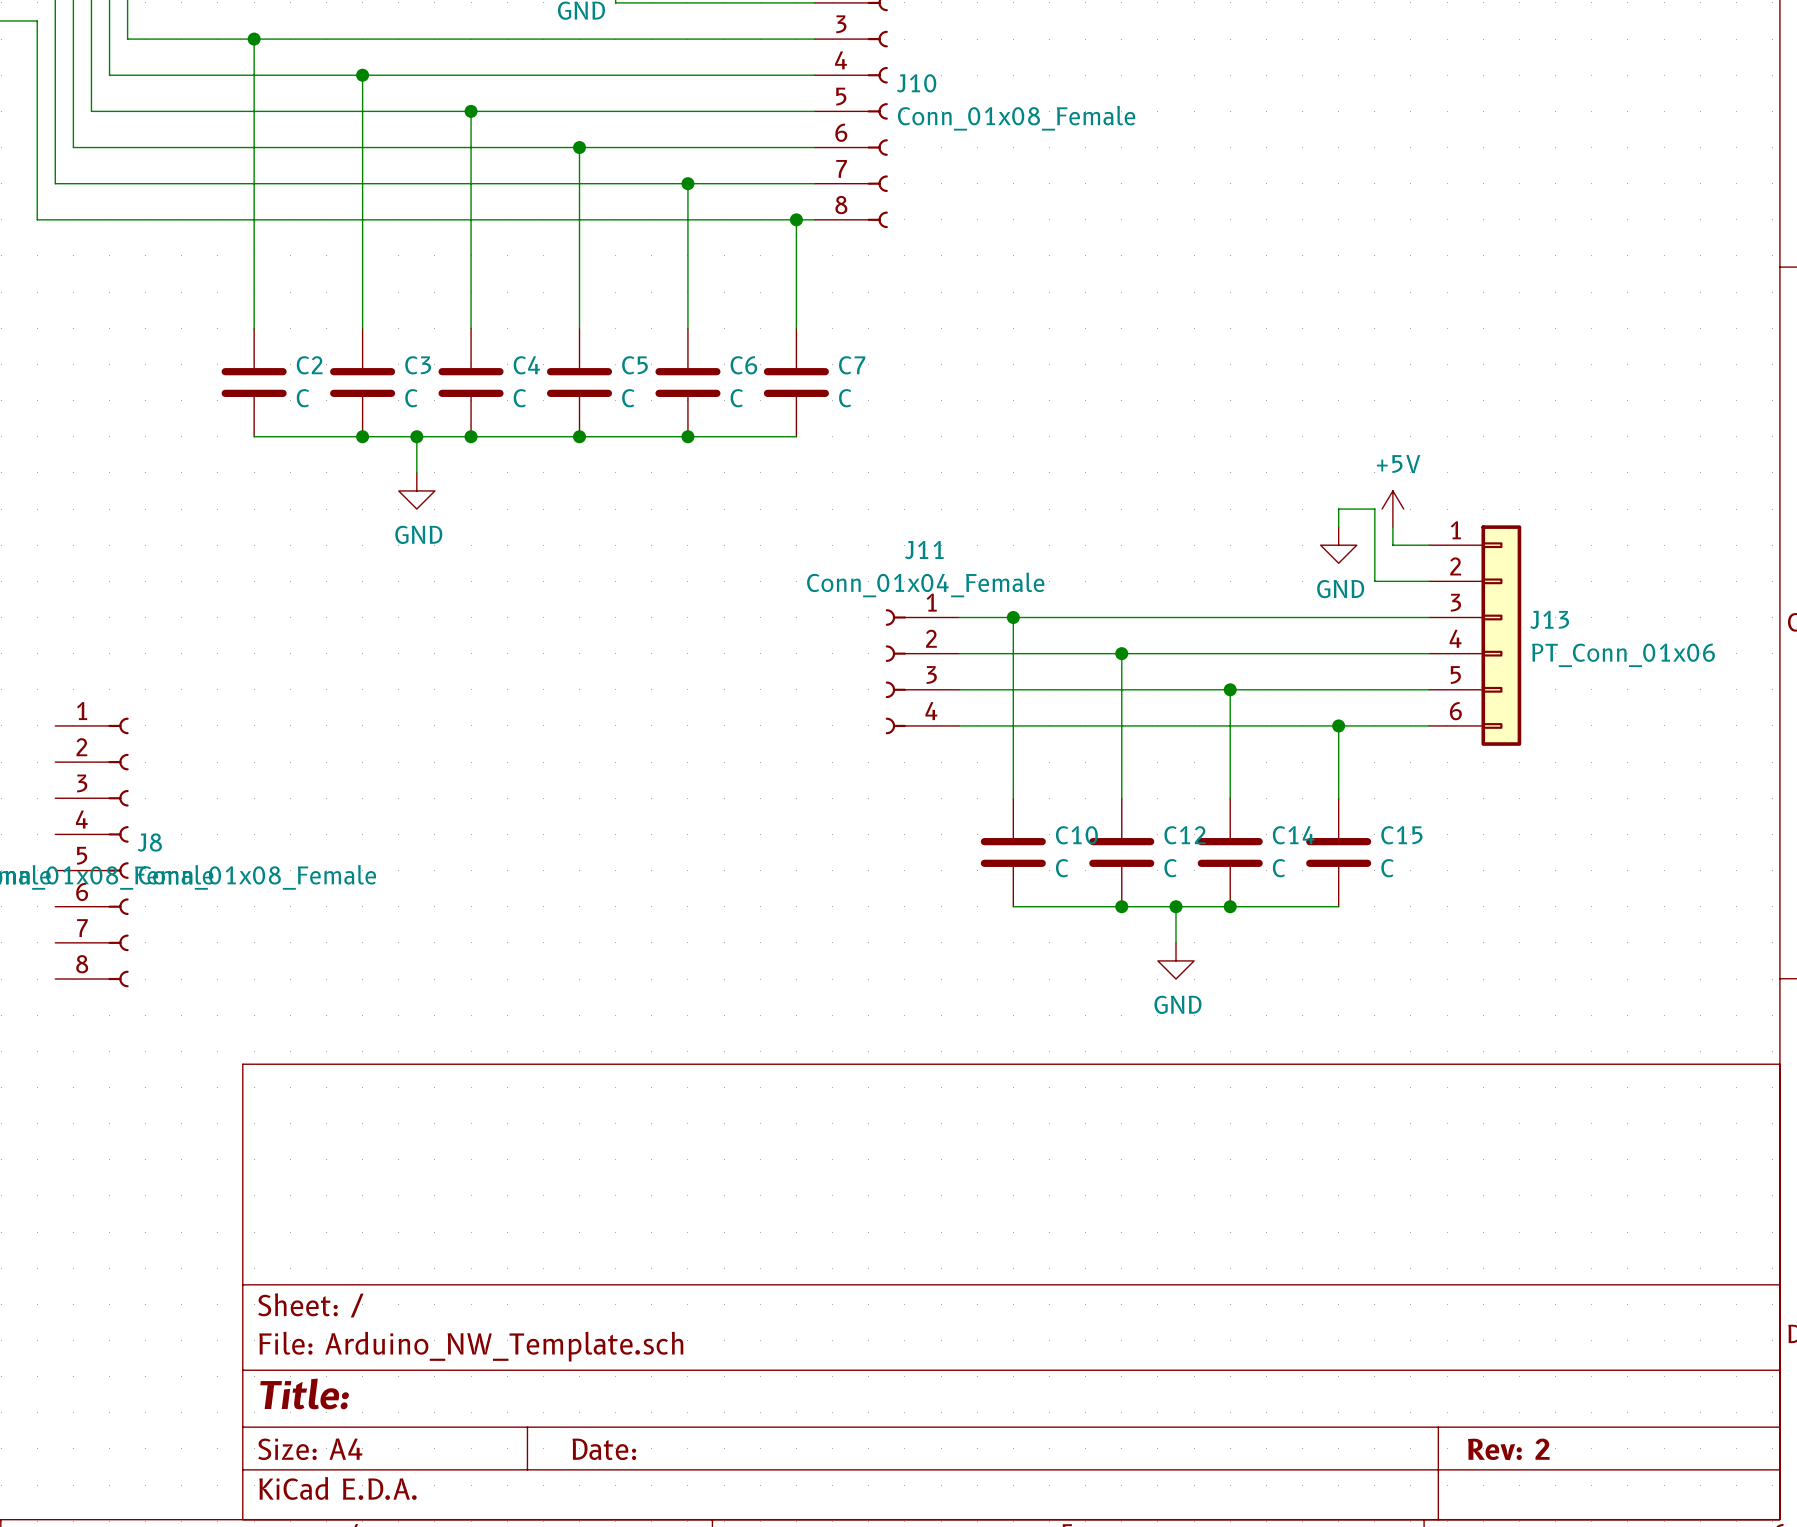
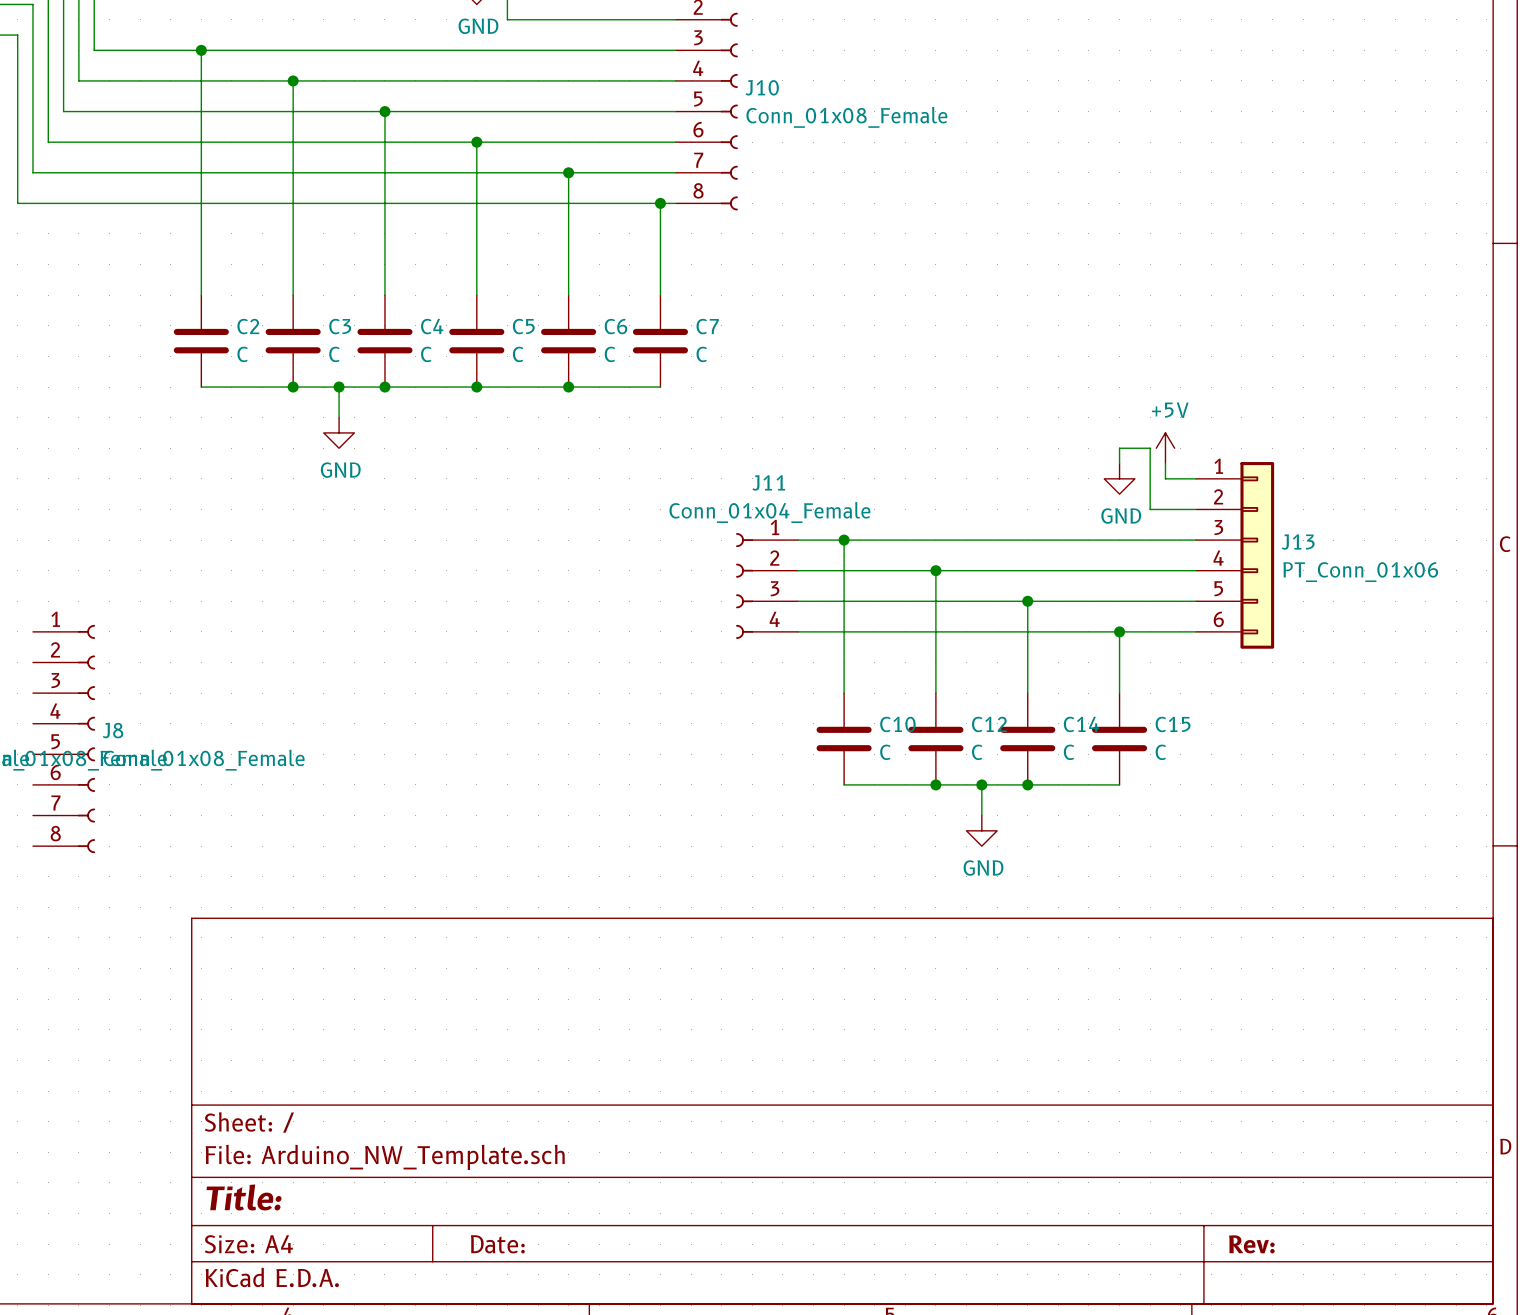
title block: Rev: 2 (1508, 1449) -> Rev: (1251, 1244)

